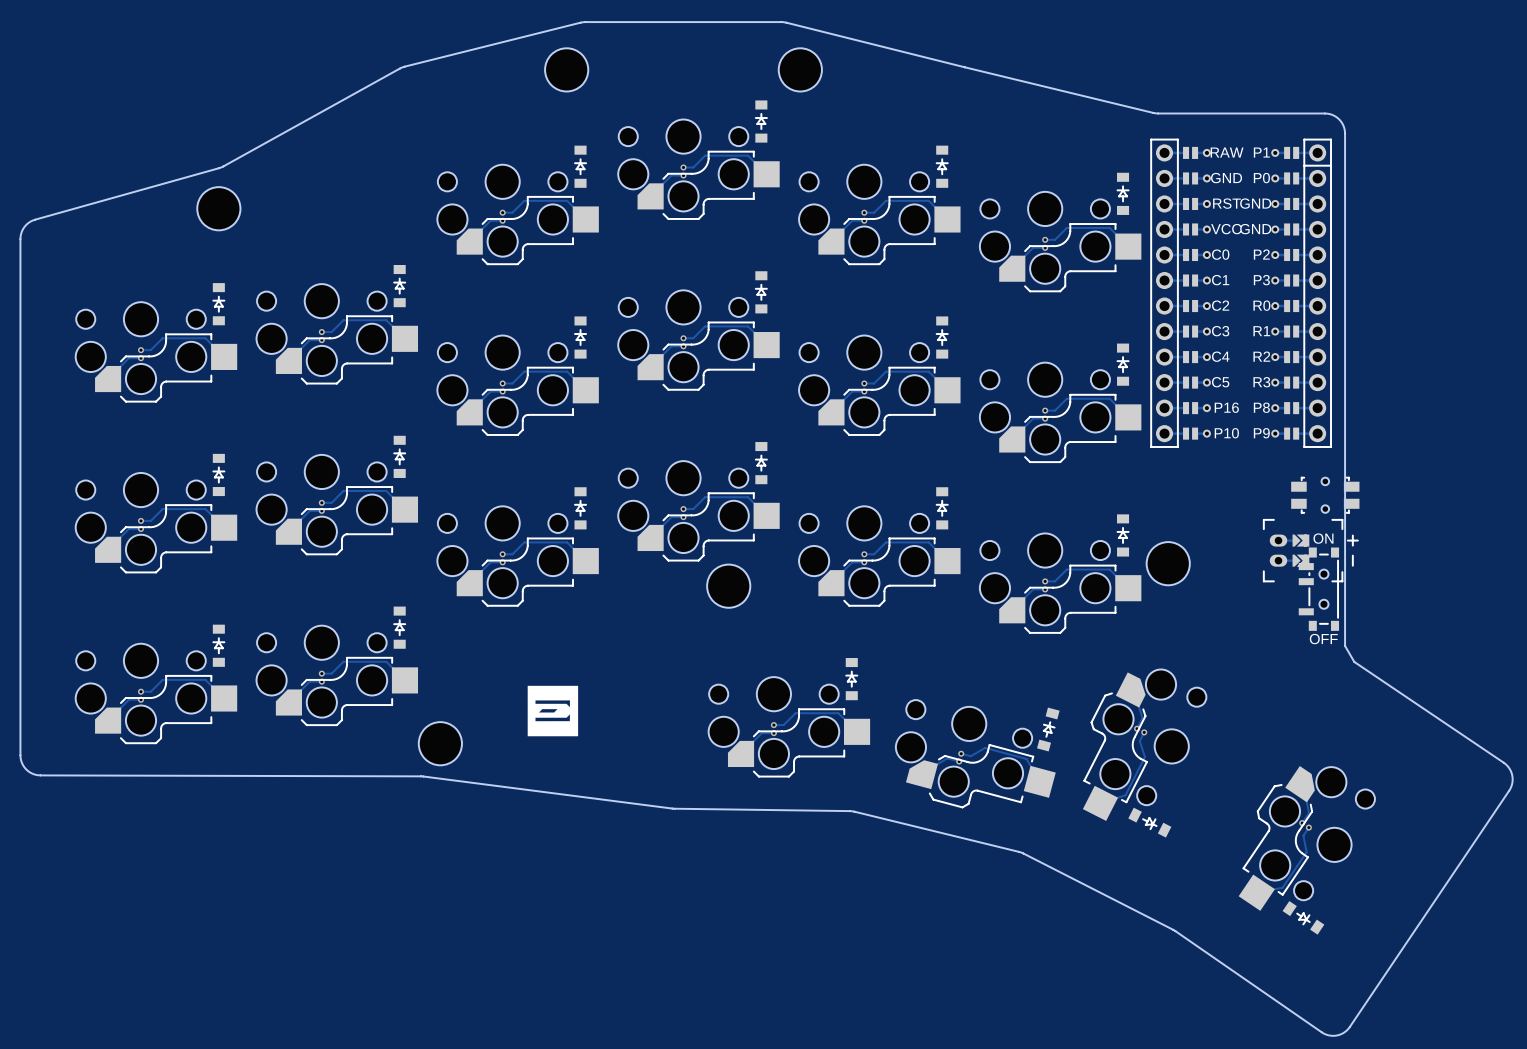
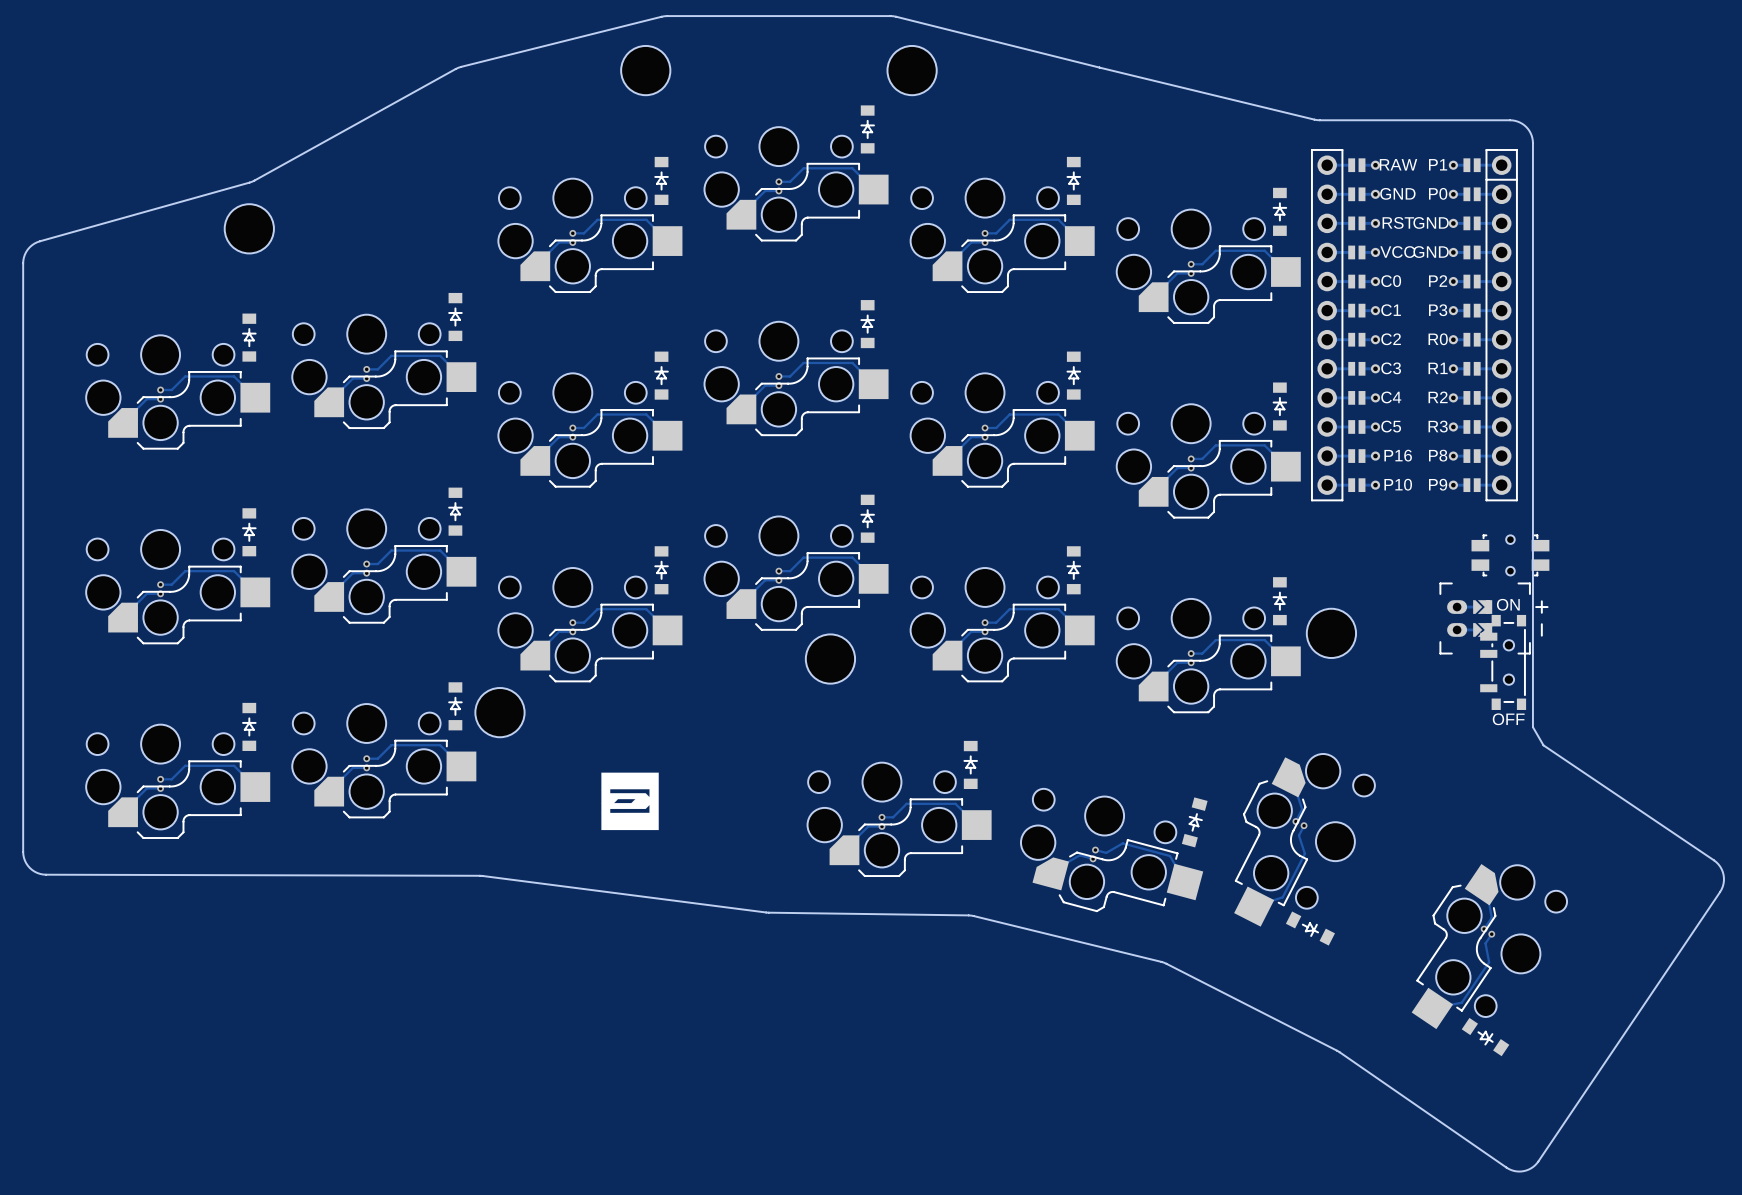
part position: (440, 743) -> (499, 712)

